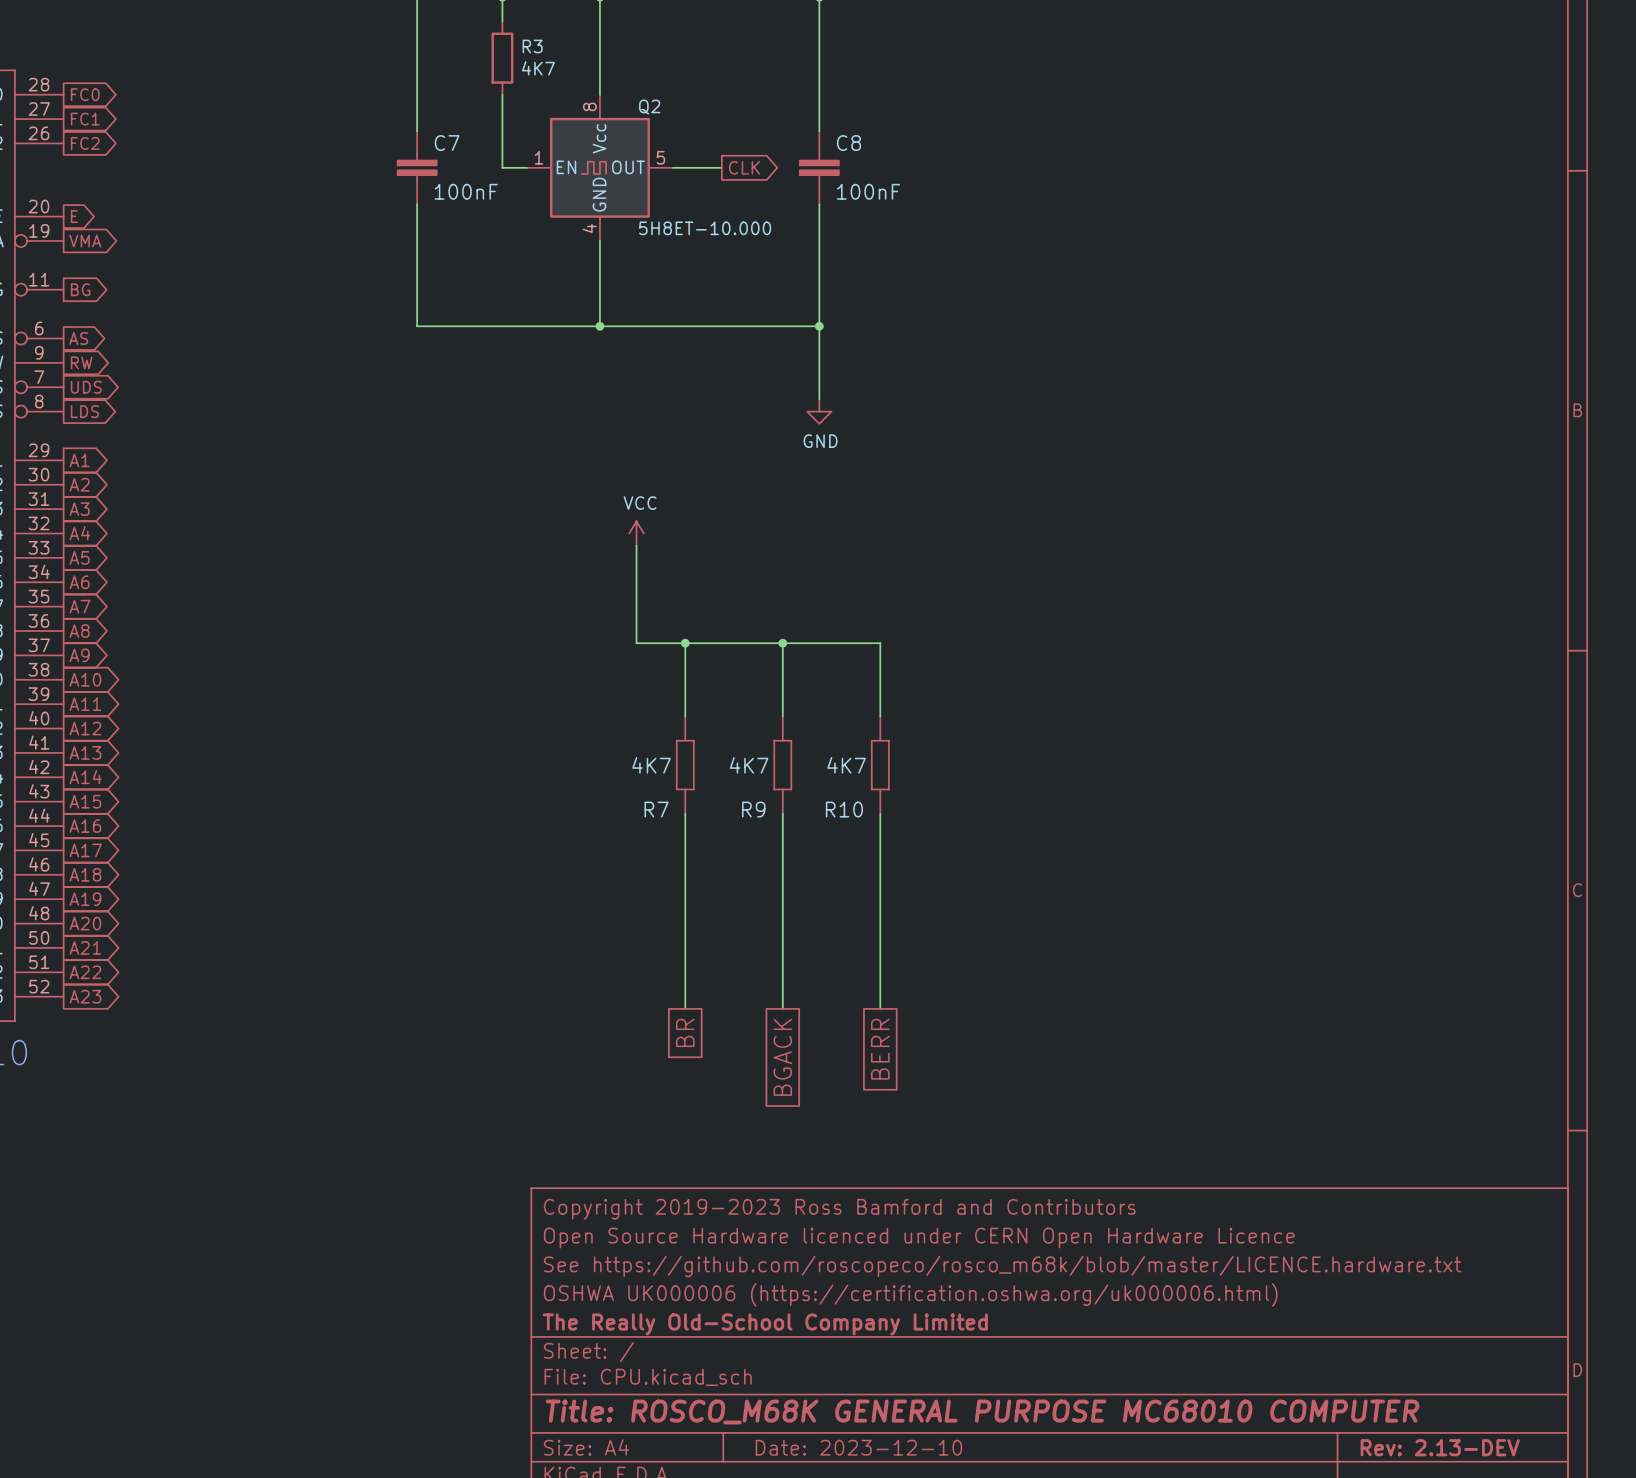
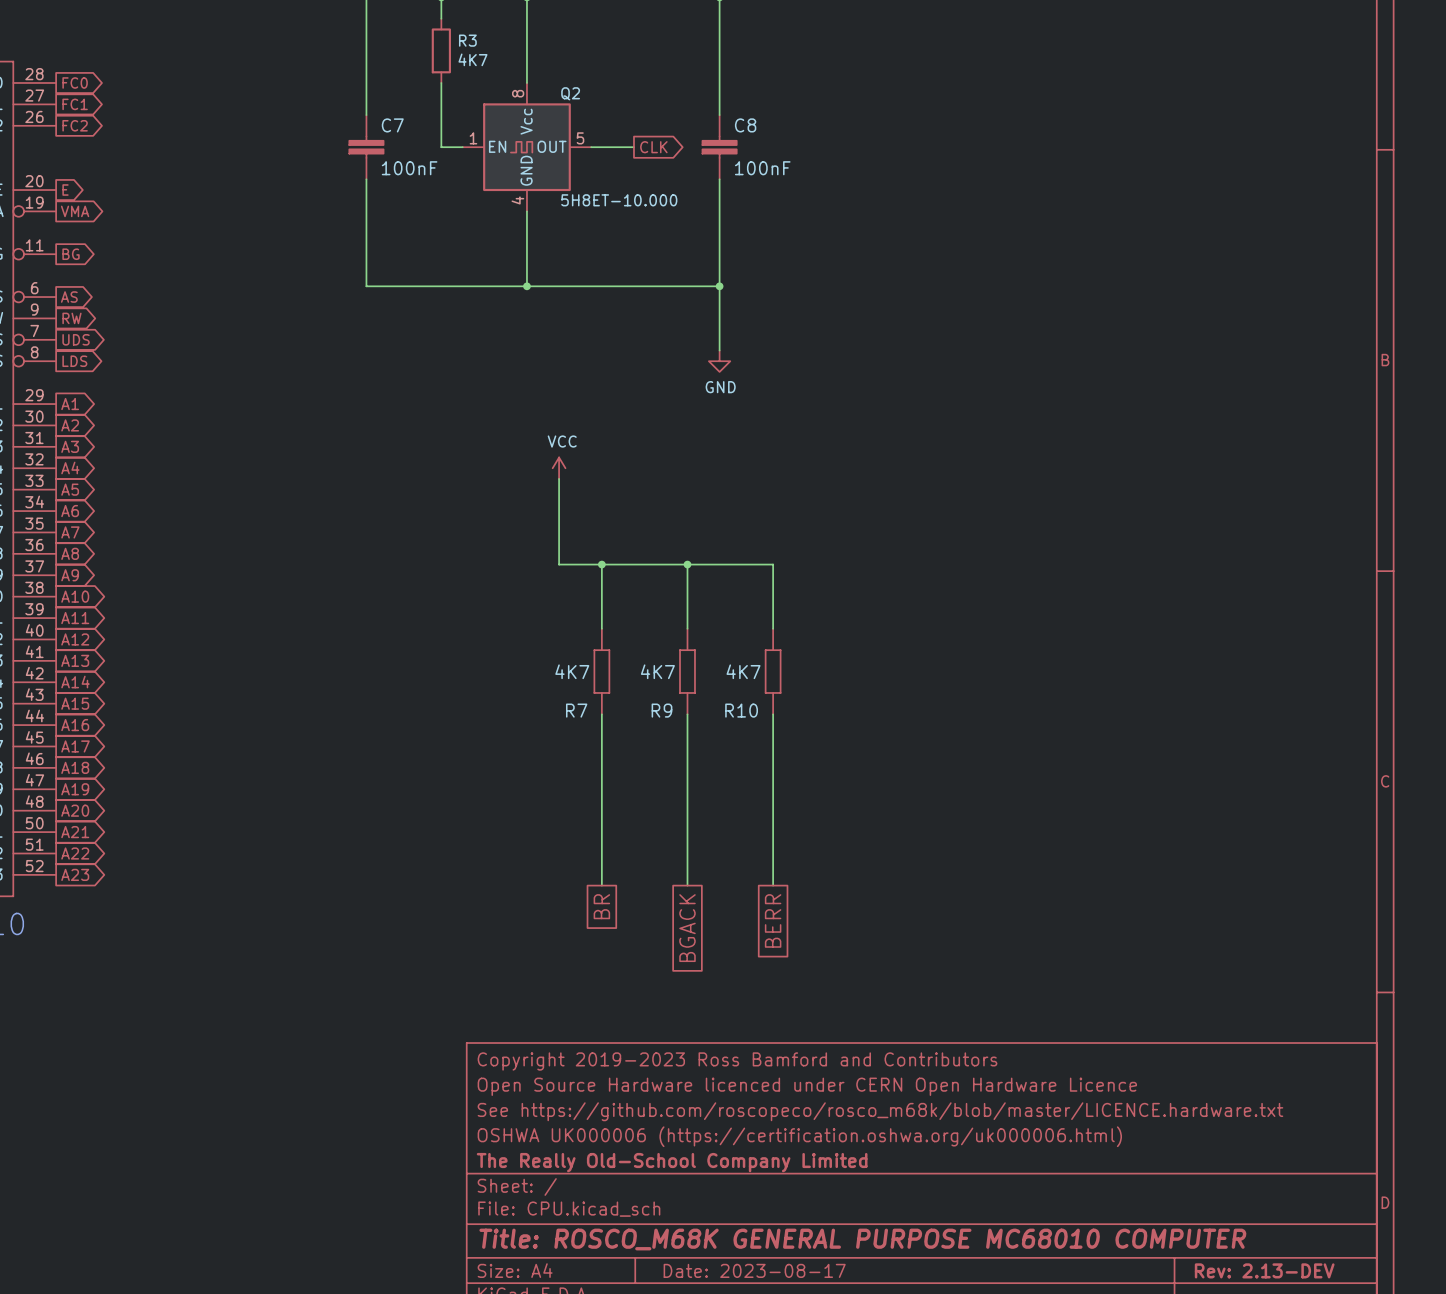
title block: Date: 2023-12-10 (858, 1447) -> Date: 2023-08-17 (754, 1270)

